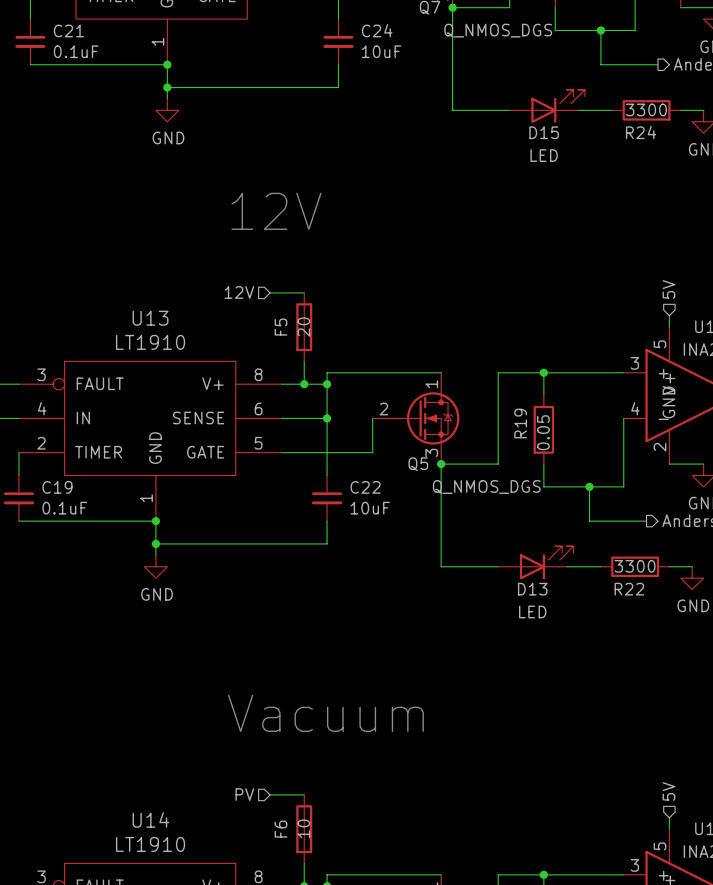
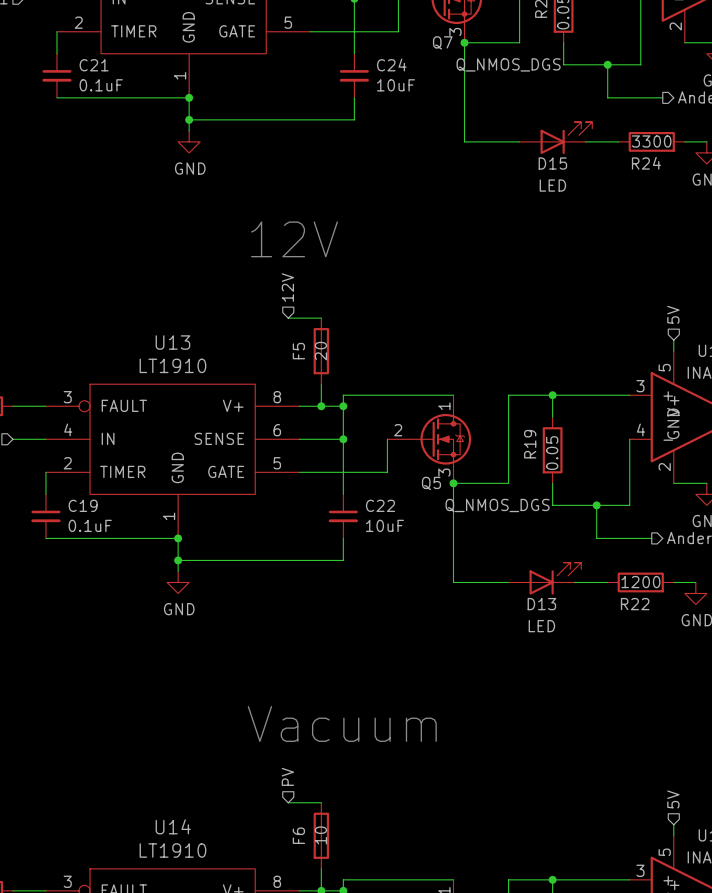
hierarchical label rotation: 0° (239, 292) -> 90° clockwise (287, 287)
hierarchical label position: 12V (239, 292) -> 12V (287, 287)
R22 value: 3300 (635, 566) -> 1200 (640, 582)
hierarchical label rotation: 0° (244, 794) -> 90° clockwise (287, 776)
hierarchical label position: PV (244, 794) -> PV (287, 776)

